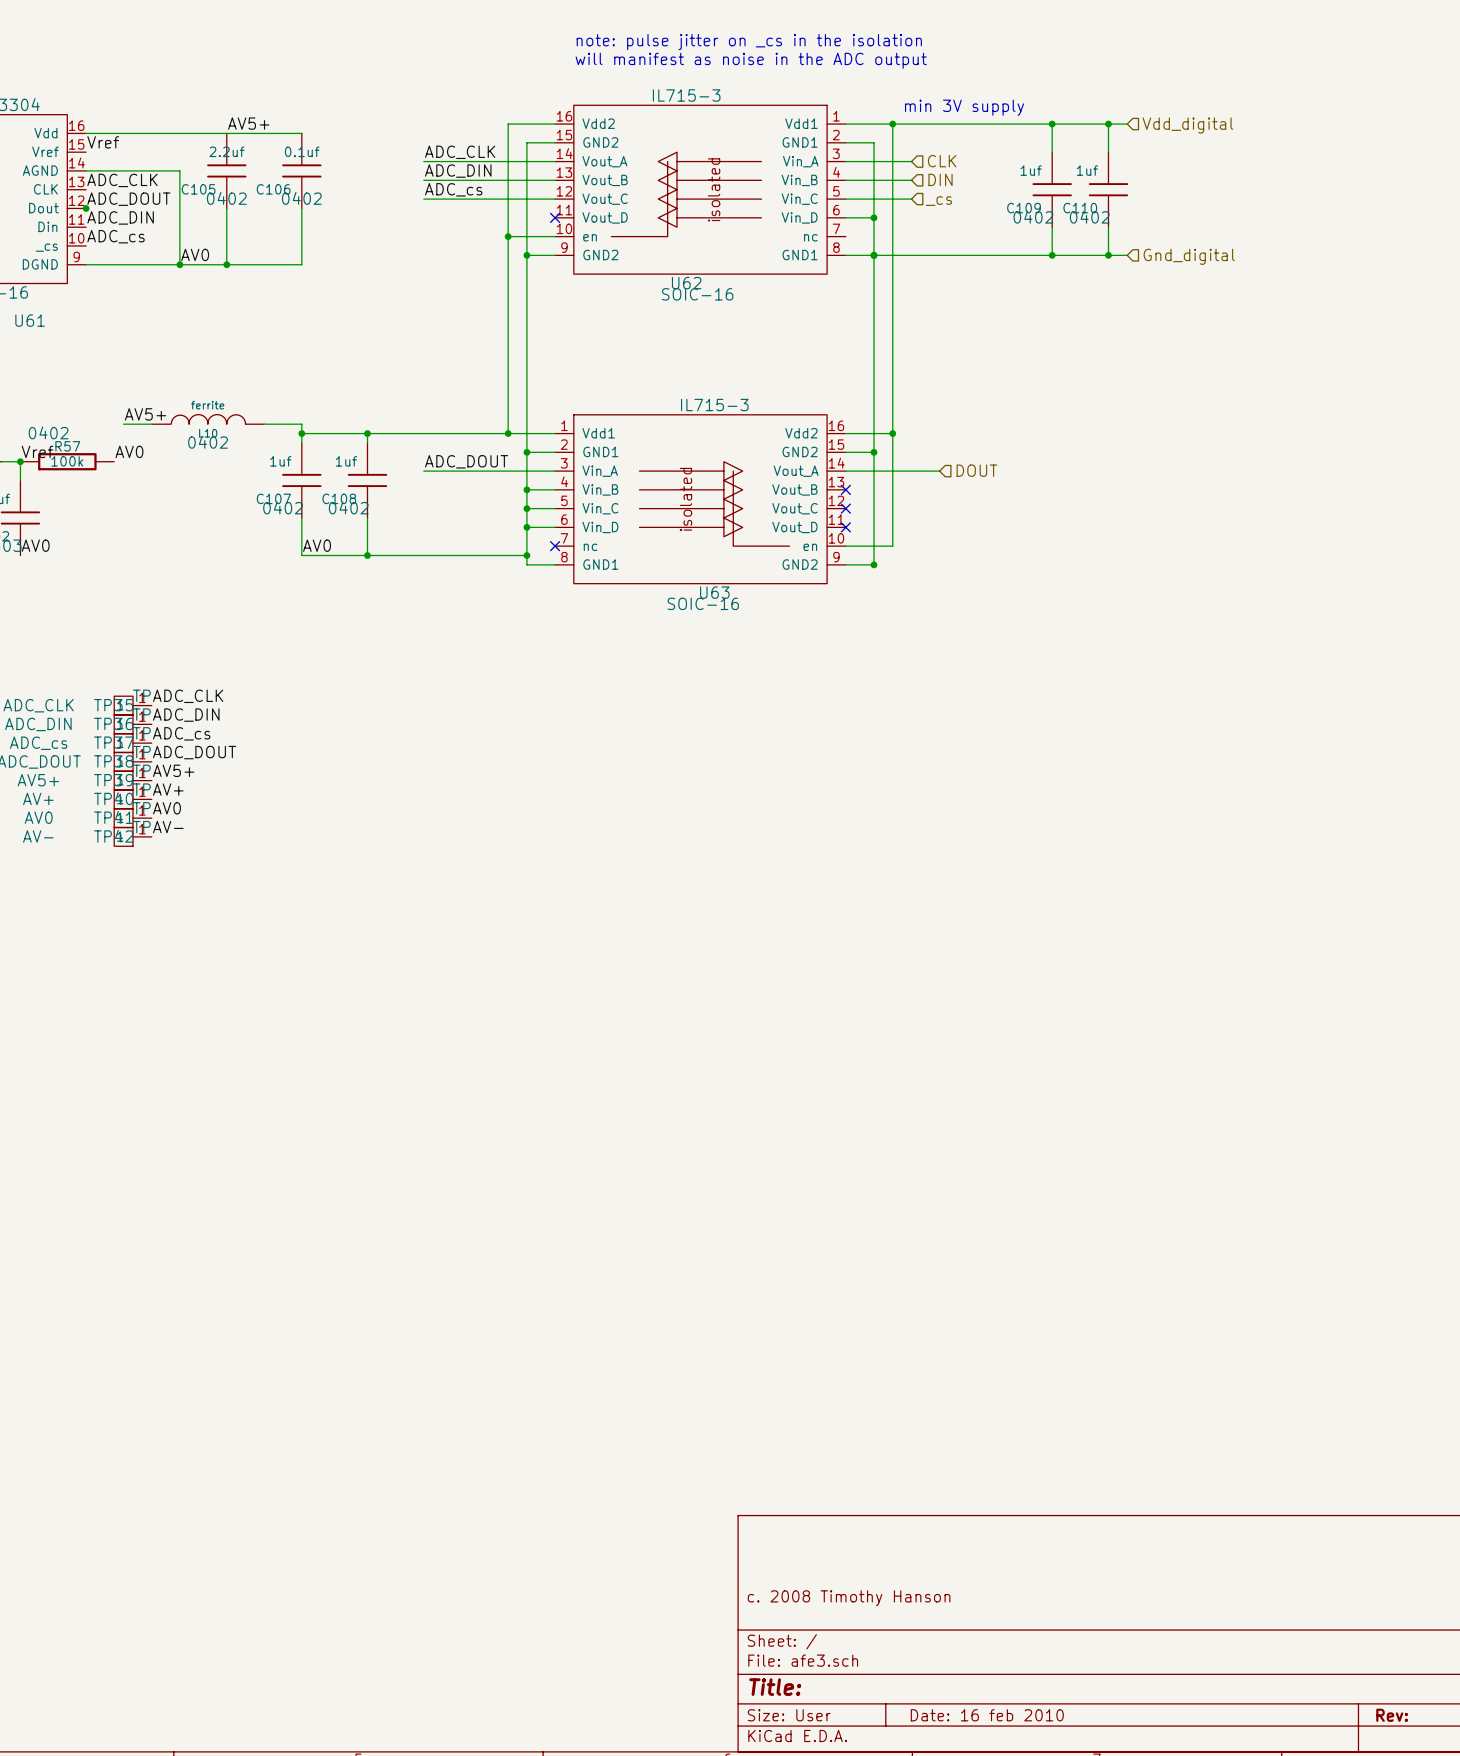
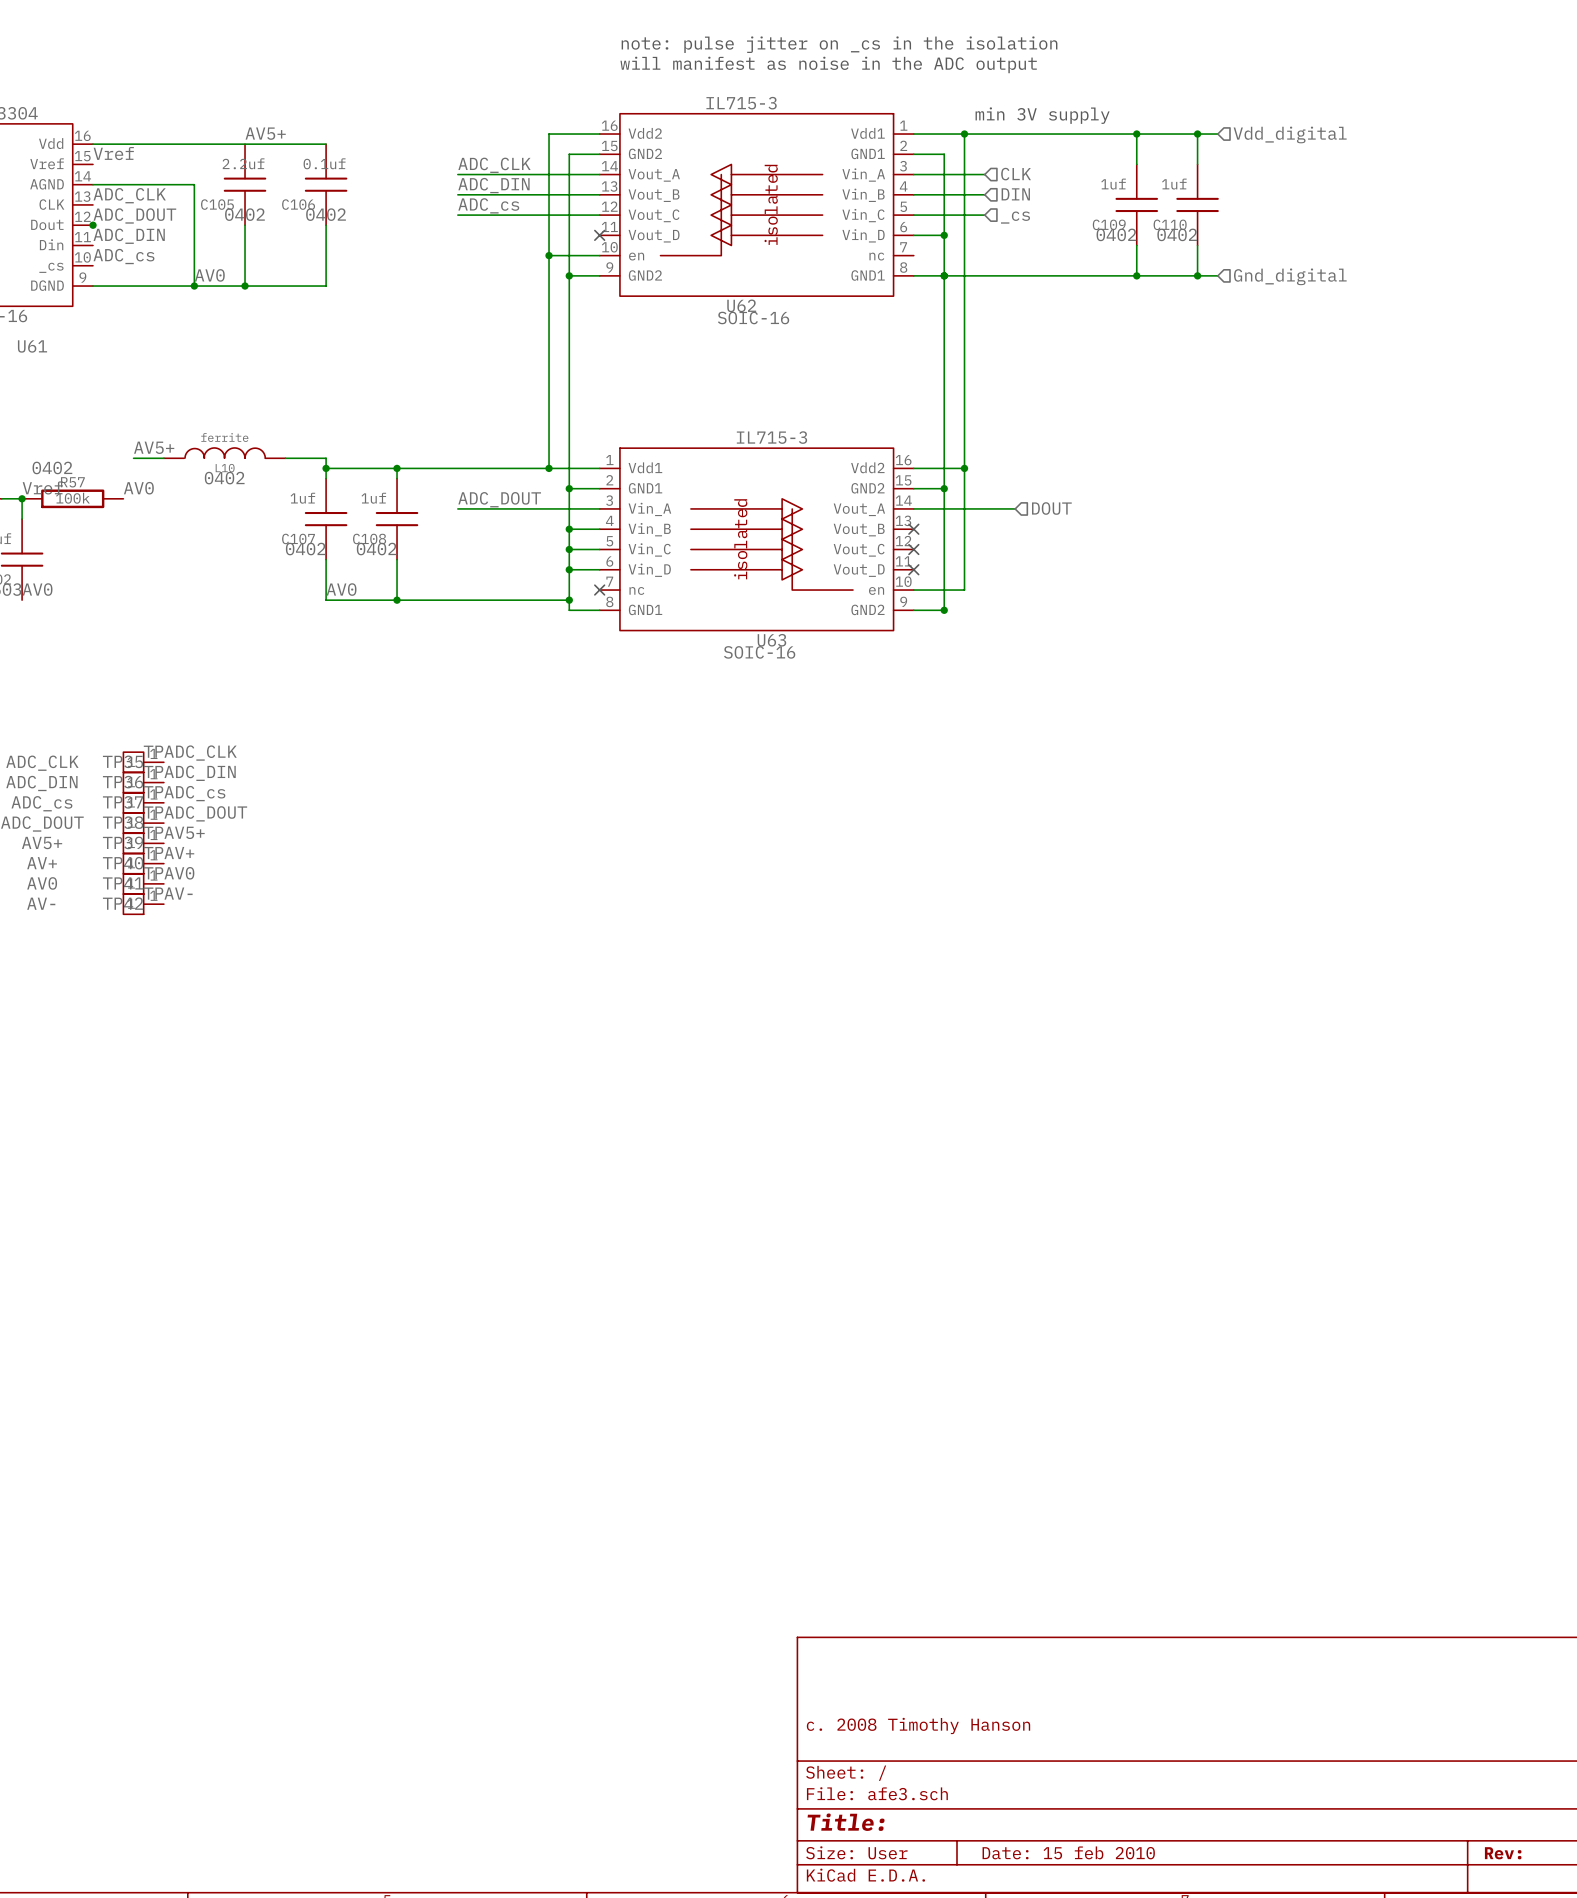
title block: Date: 16 feb 2010 (987, 1715) -> Date: 15 feb 2010 (1068, 1852)

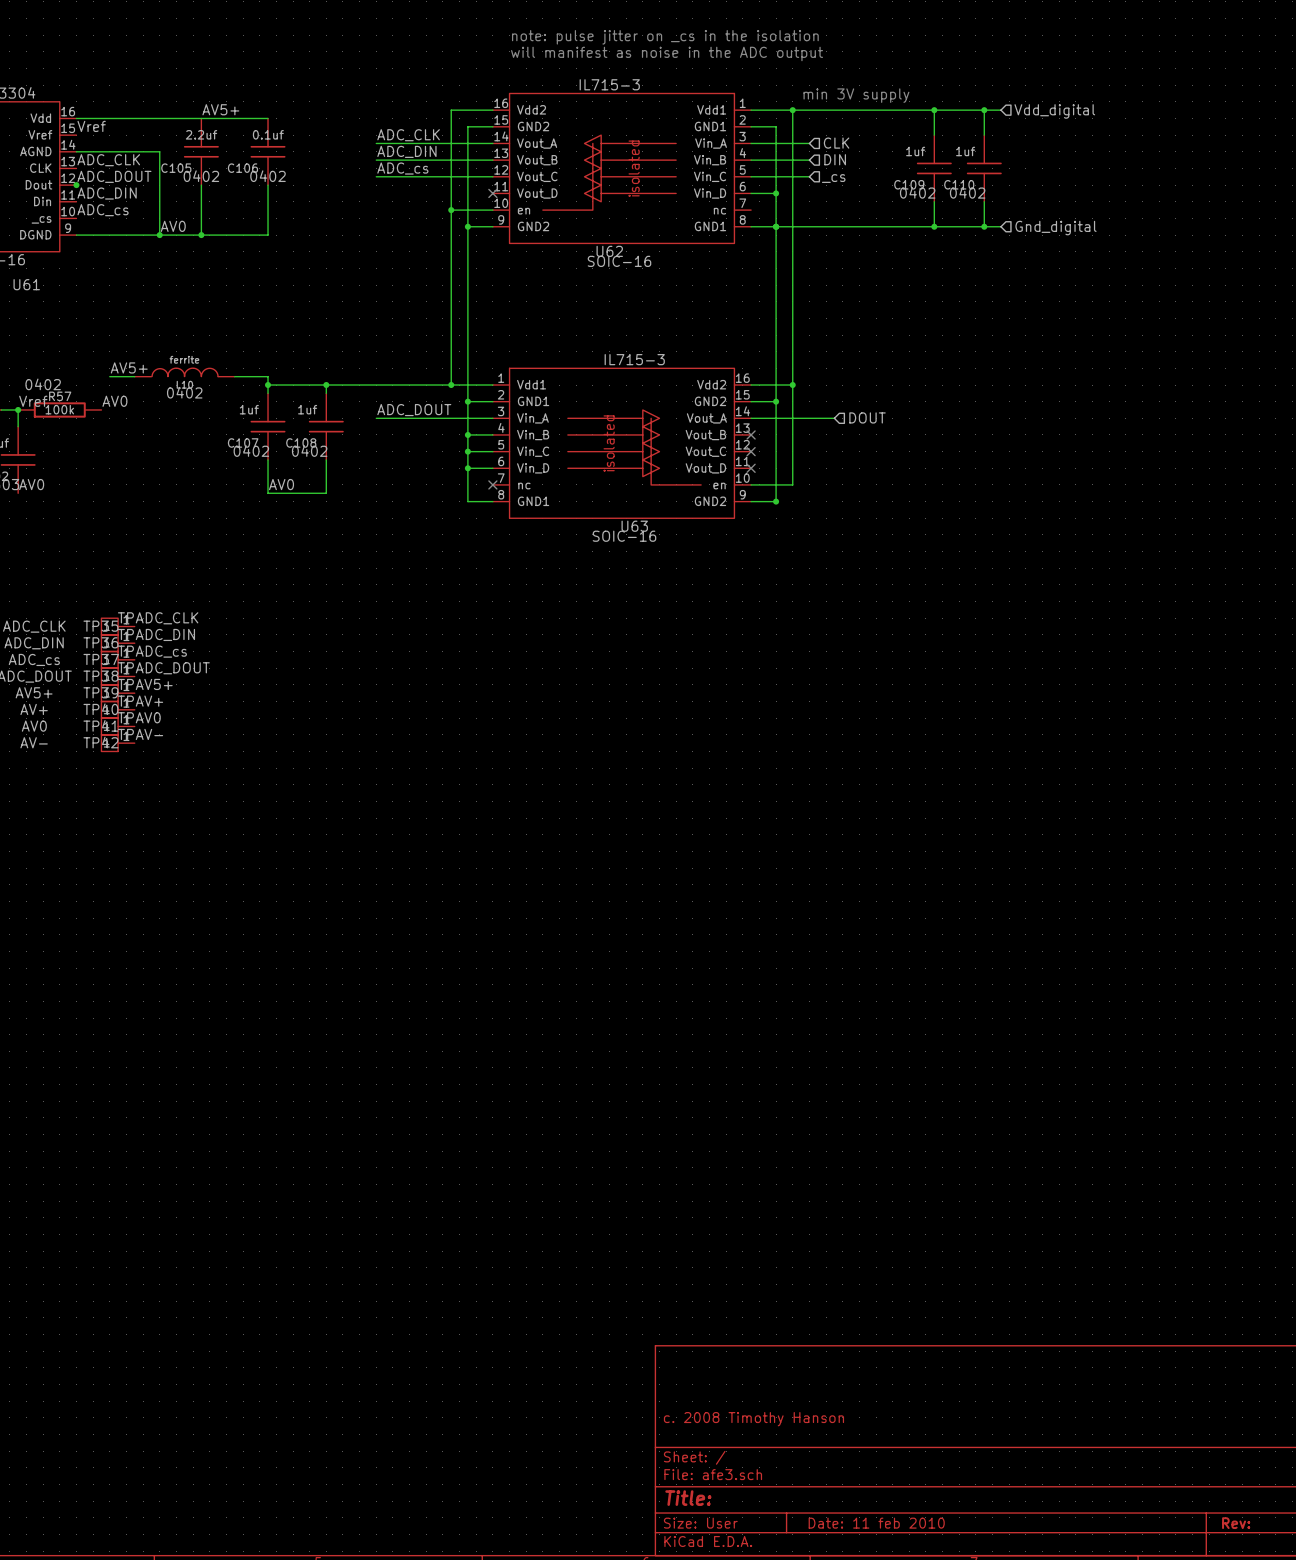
wire: (397, 600) (569, 600) -> none
junction: (397, 600) -> none
junction: (569, 600) -> none
title block: Date: 15 feb 2010 (1068, 1852) -> Date: 11 feb 2010 (876, 1523)

